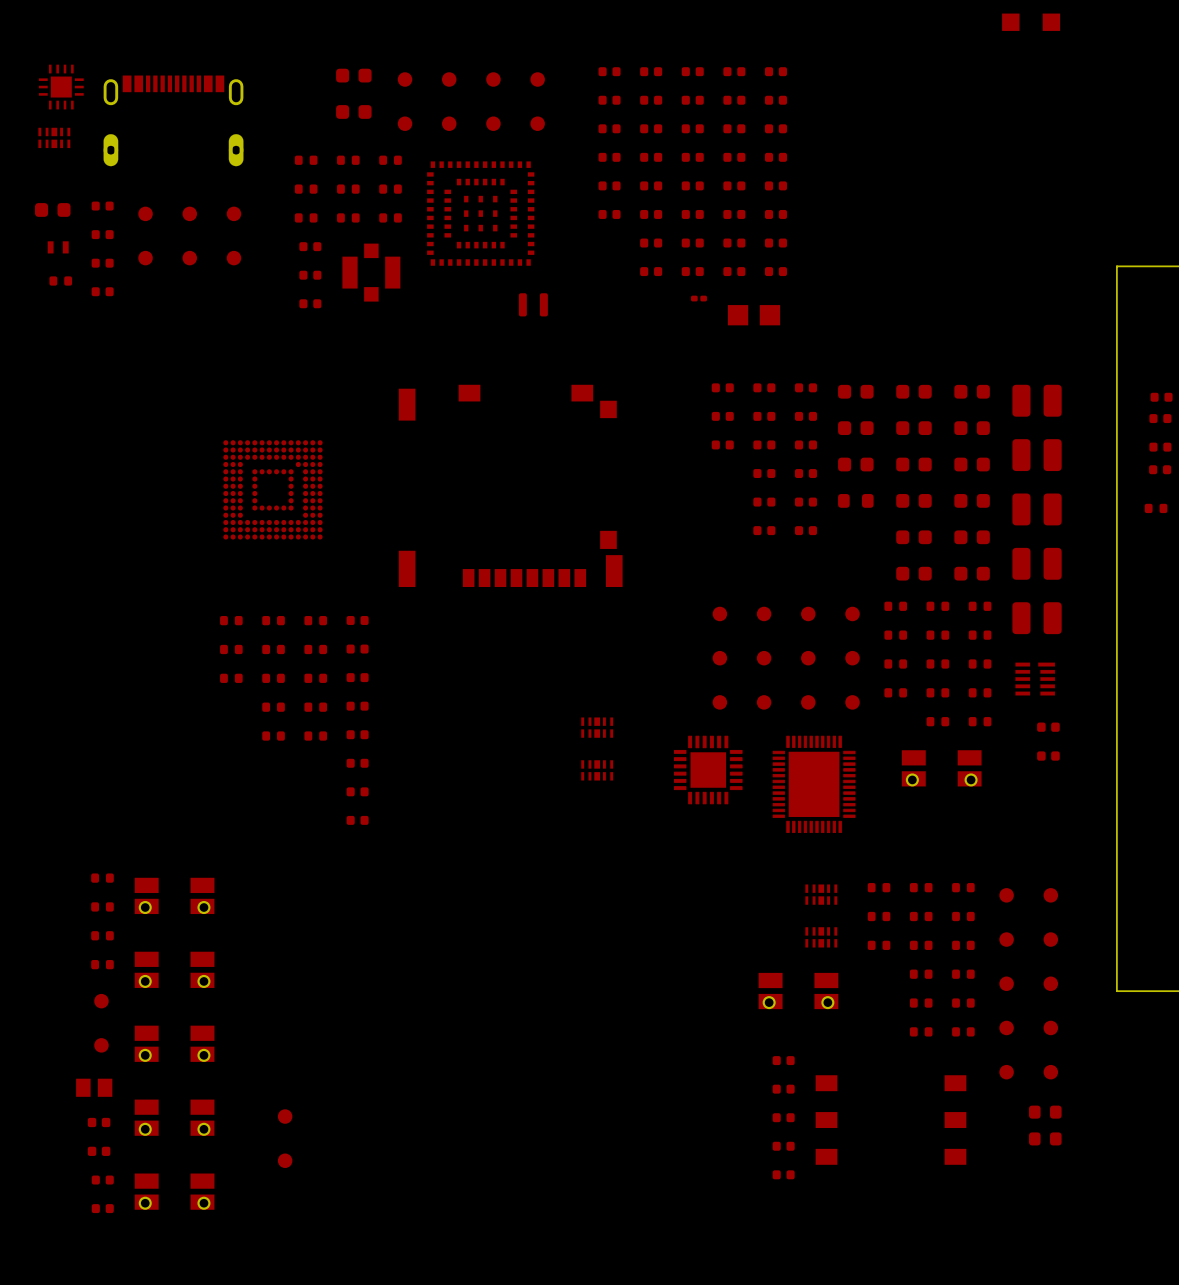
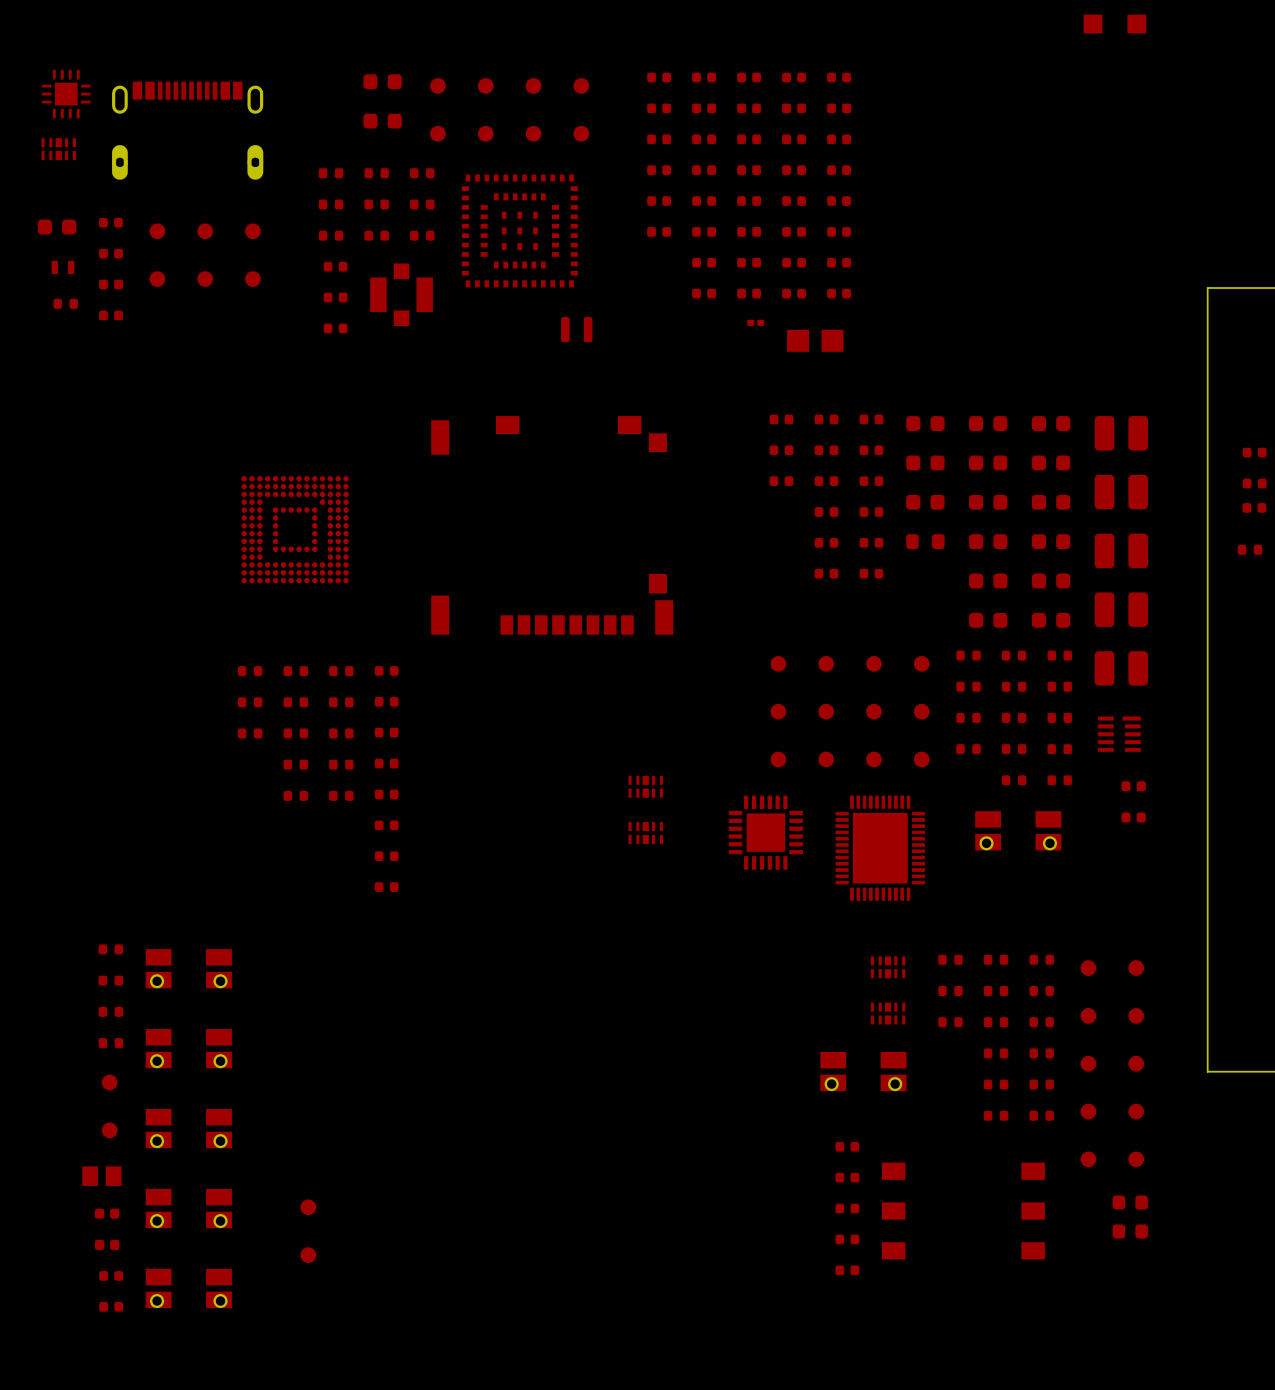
part: (1161, 397) -> none

